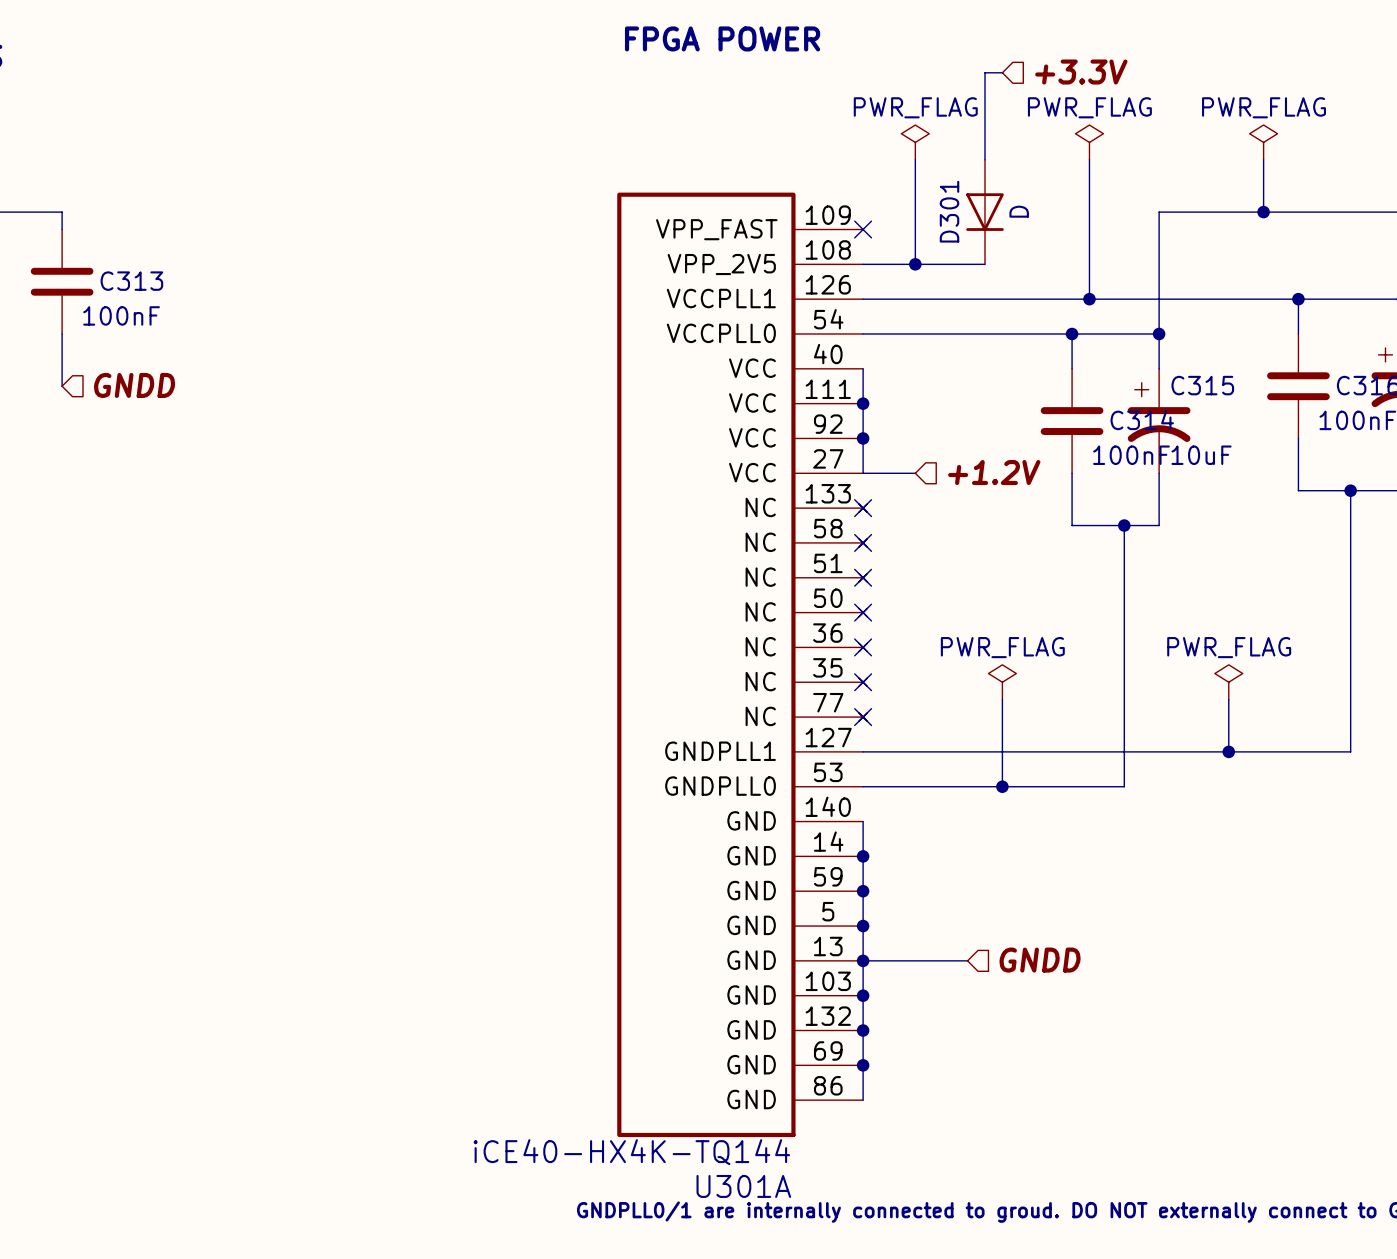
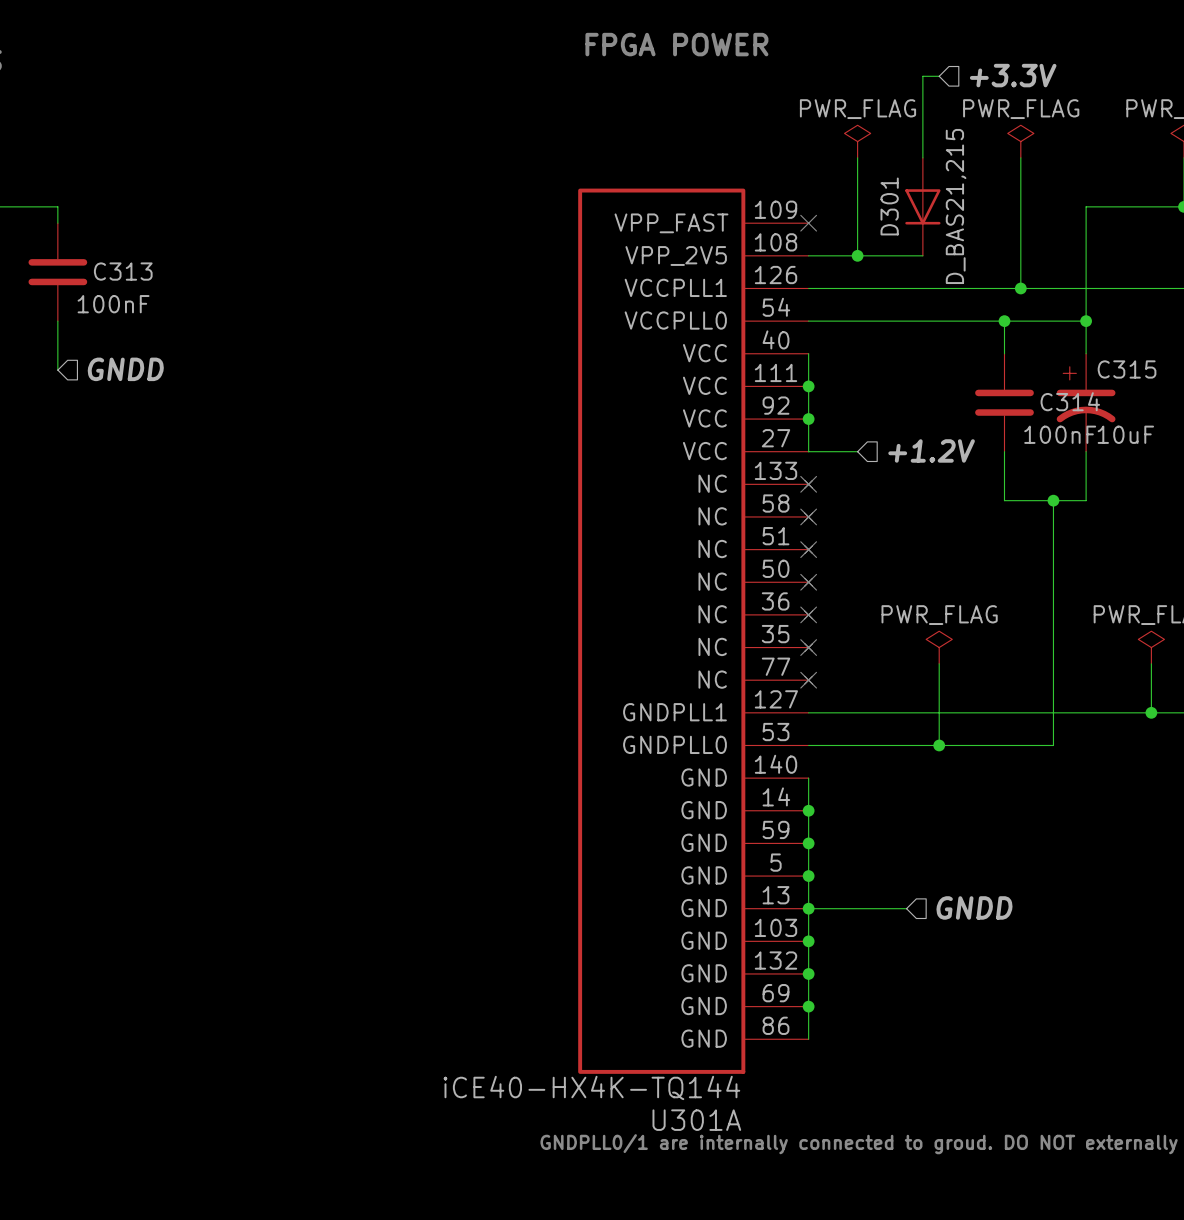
D301 value: D (1019, 211) -> D_BAS21,215 (956, 206)

